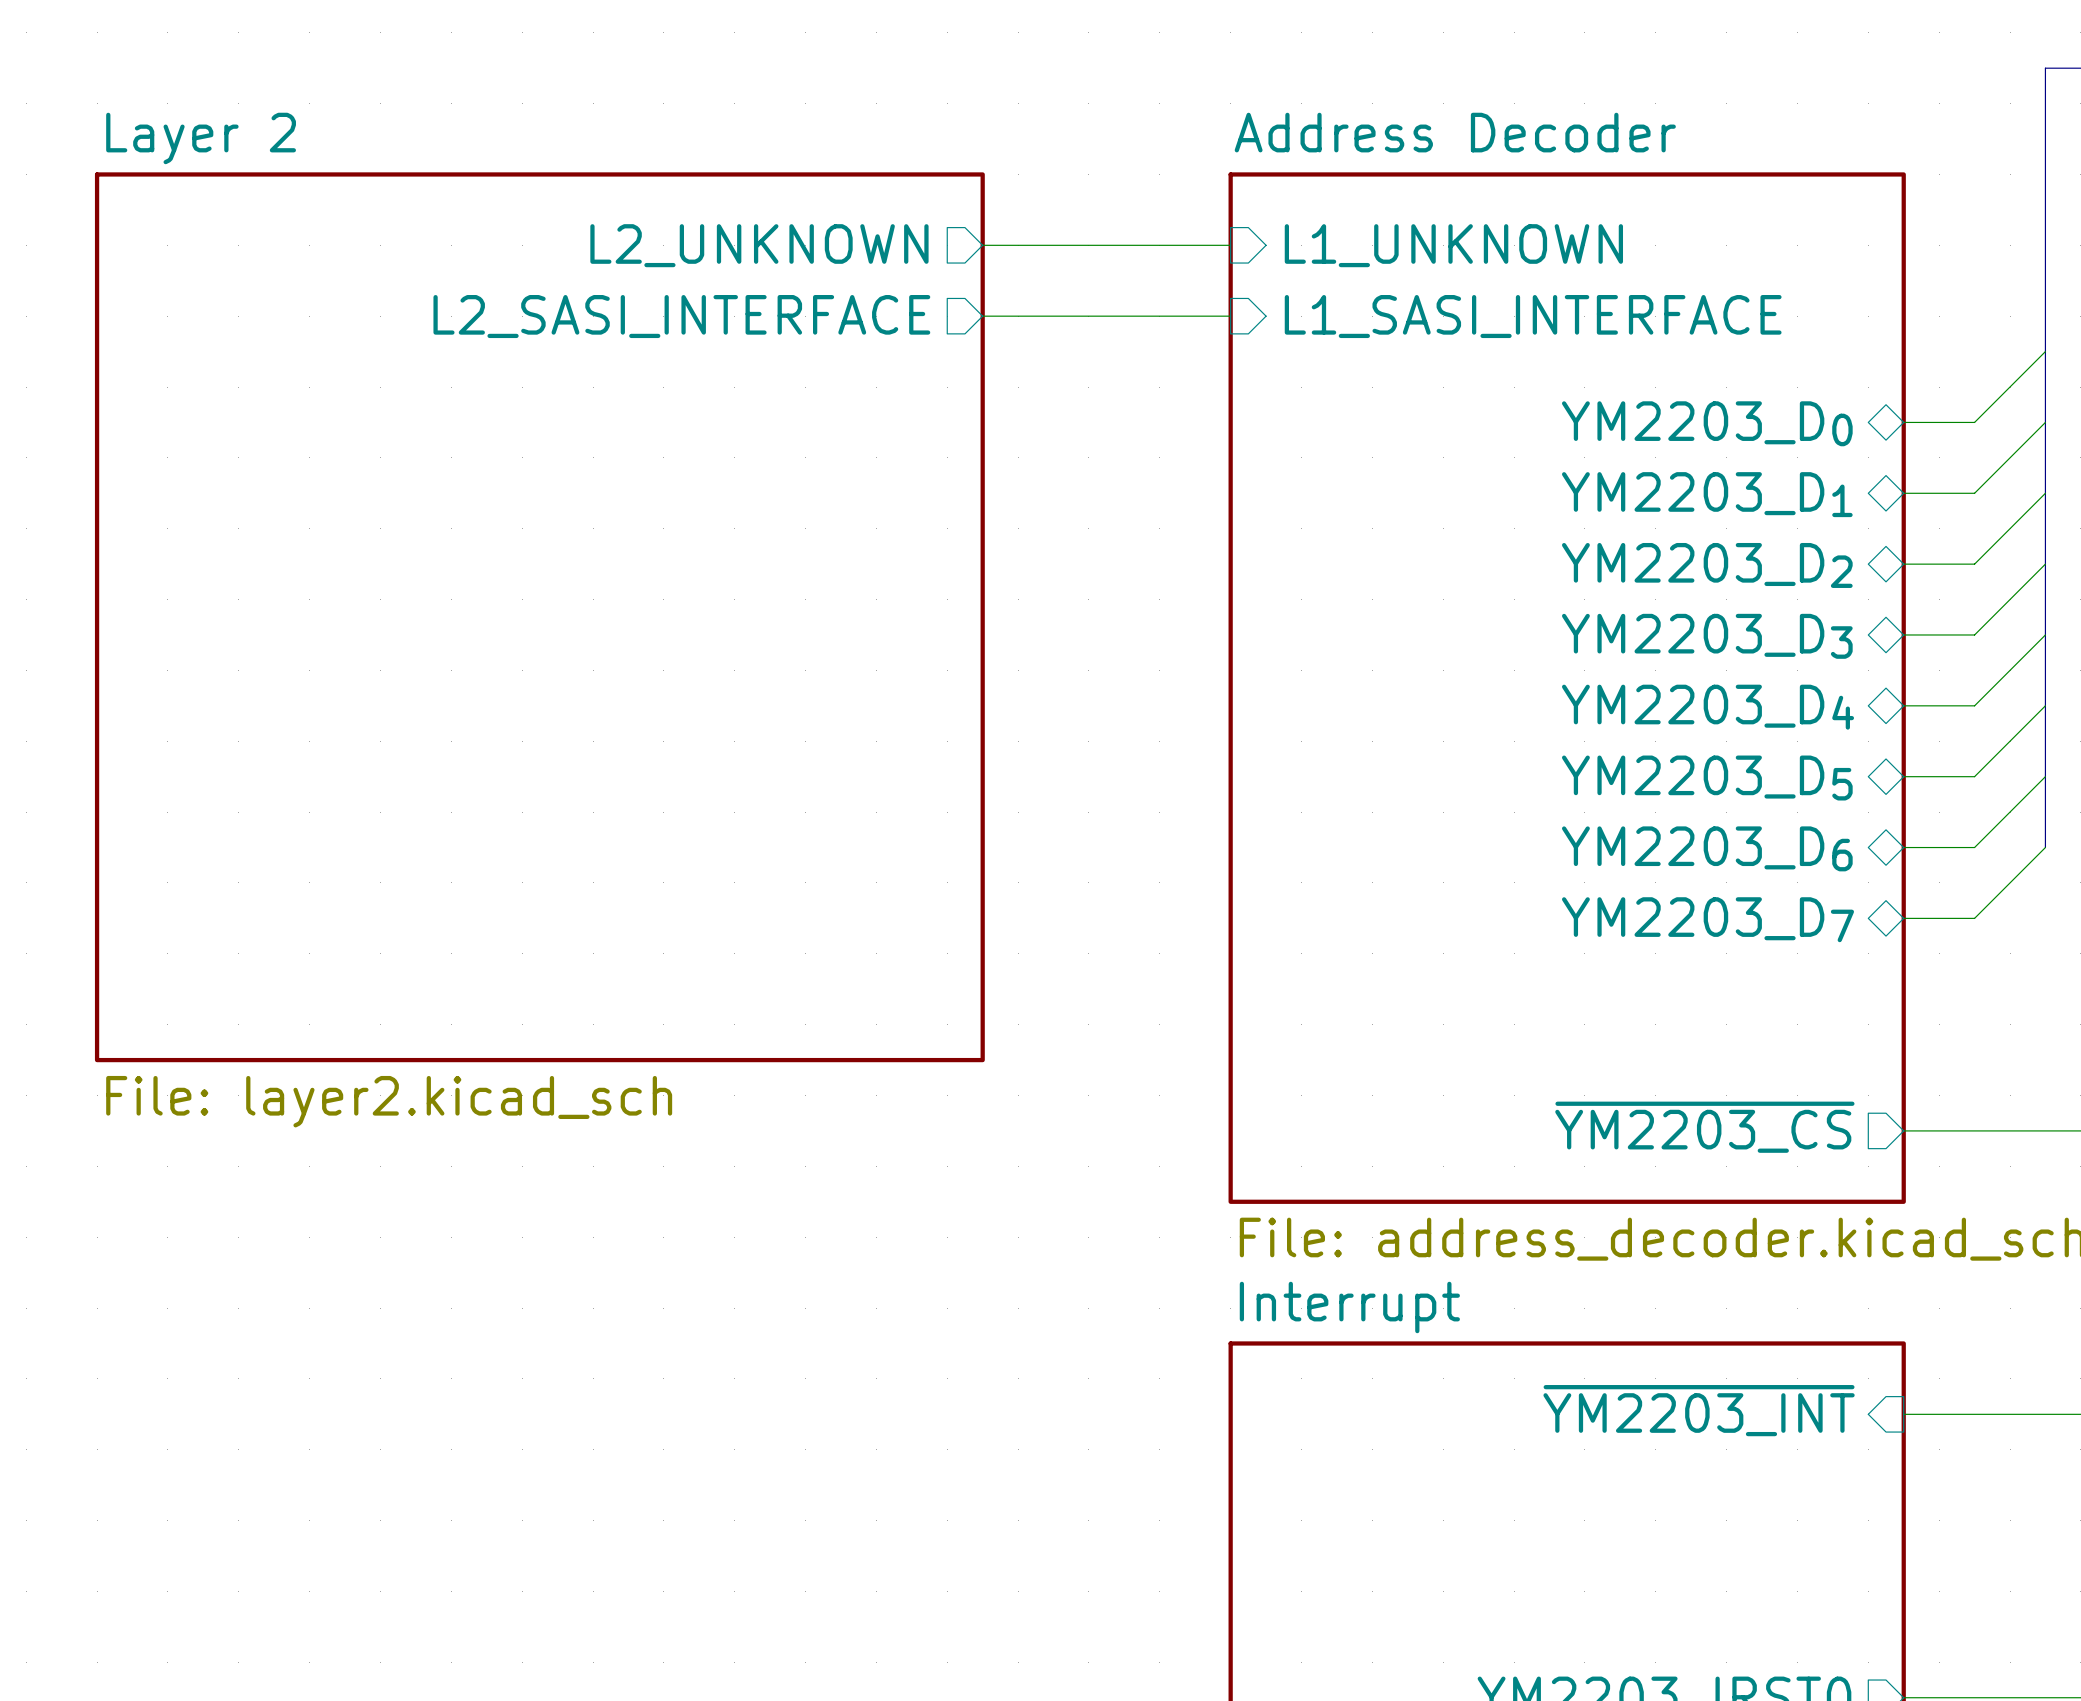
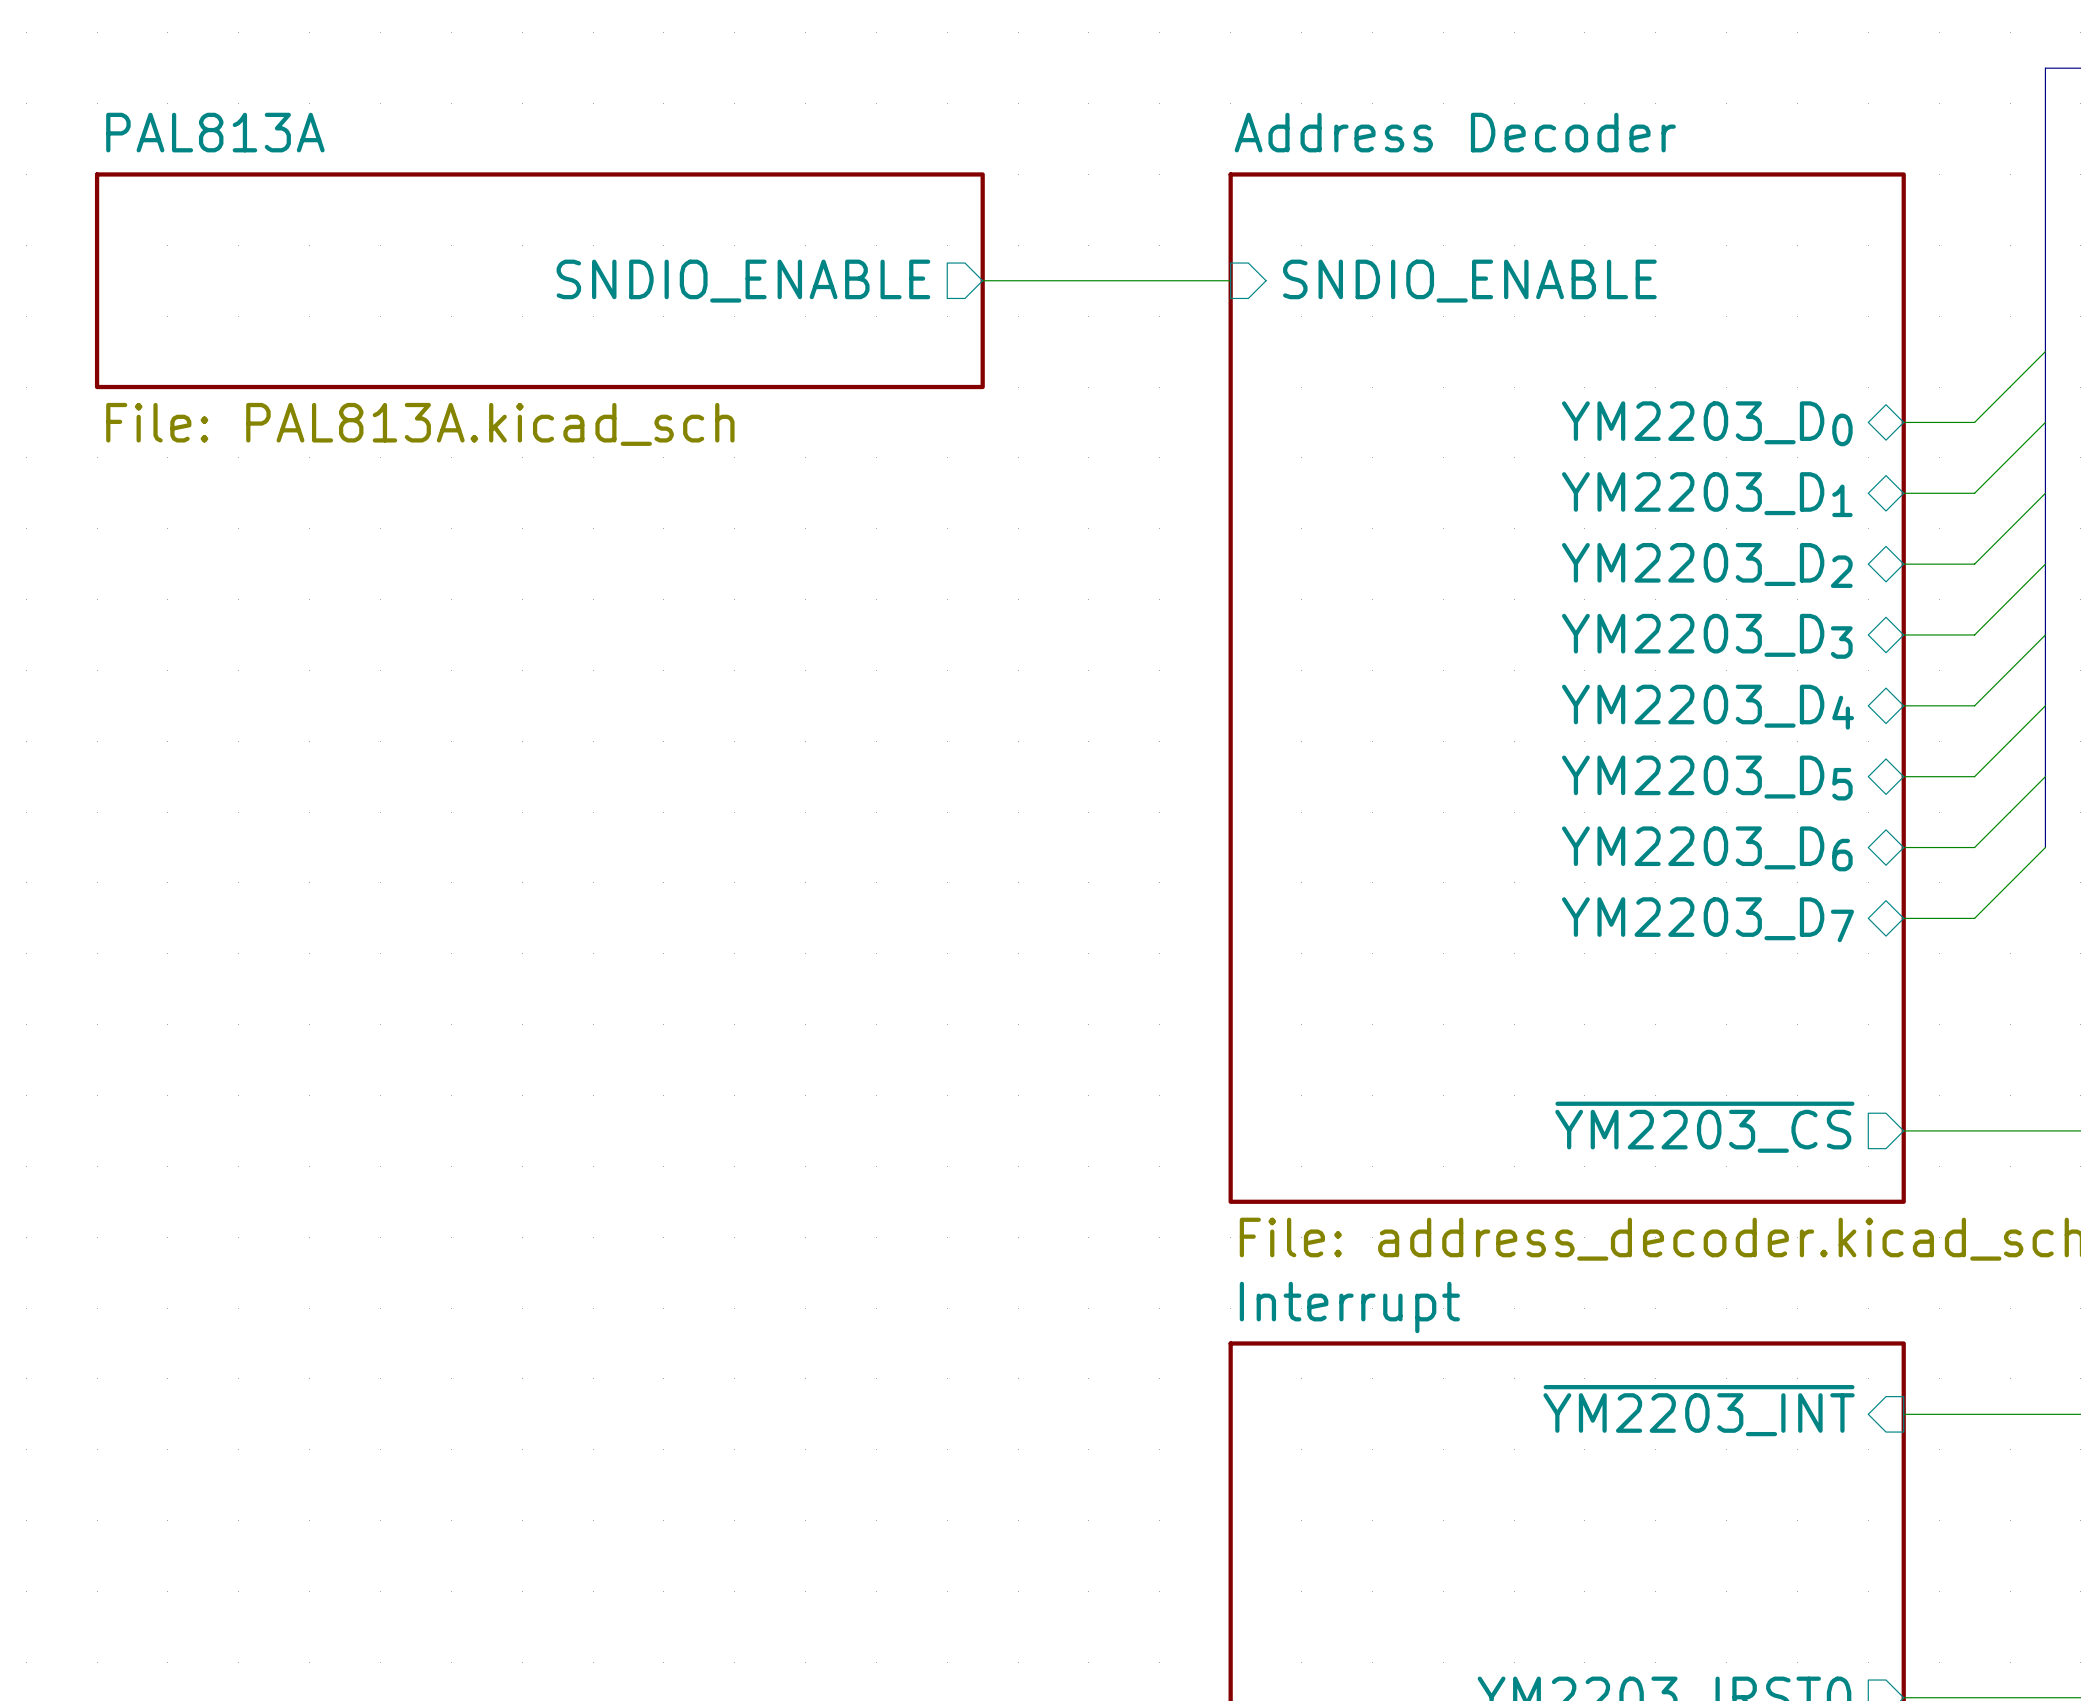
sheet pin: L2_UNKNOWN (759, 245) -> none
wire: (982, 245) (1230, 245) -> none
sheet pin: L1_UNKNOWN (1453, 245) -> none
sheet PAL813A: none -> File: PAL813A.kicad_sch (539, 280)
sheet pin: none -> SNDIO_ENABLE (743, 281)
sheet pin: none -> SNDIO_ENABLE (1469, 281)
sheet pin: L2_SASI_INTERFACE (681, 316) -> none
wire: (982, 316) (1230, 316) -> (982, 280) (1230, 280)
sheet pin: L1_SASI_INTERFACE (1533, 316) -> none
sheet Layer 2: File: layer2.kicad_sch (539, 617) -> none

